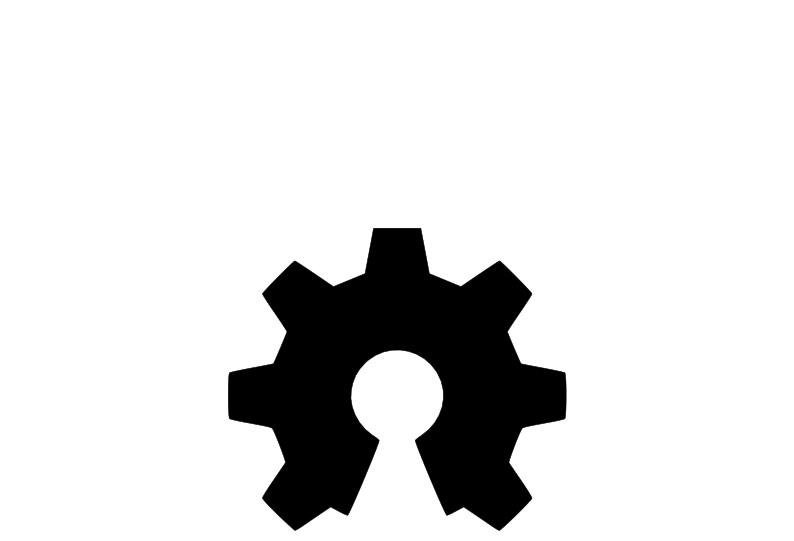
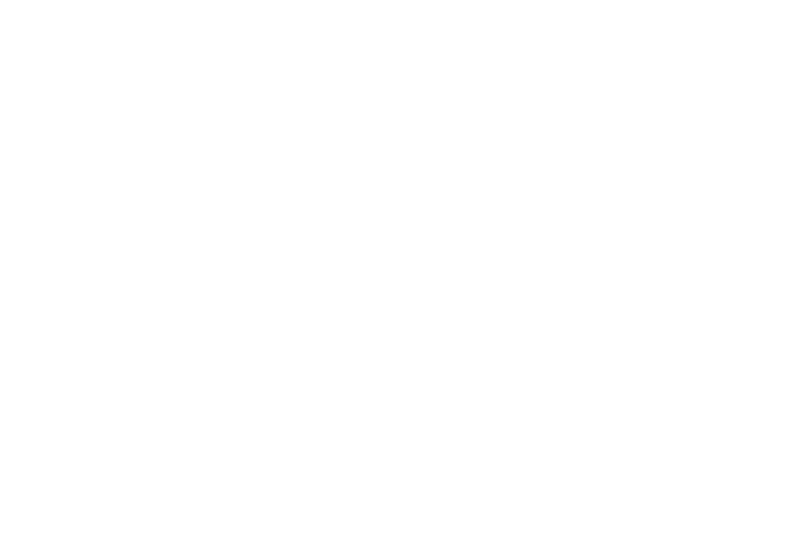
drawing: [227, 227, 567, 531] -> none

